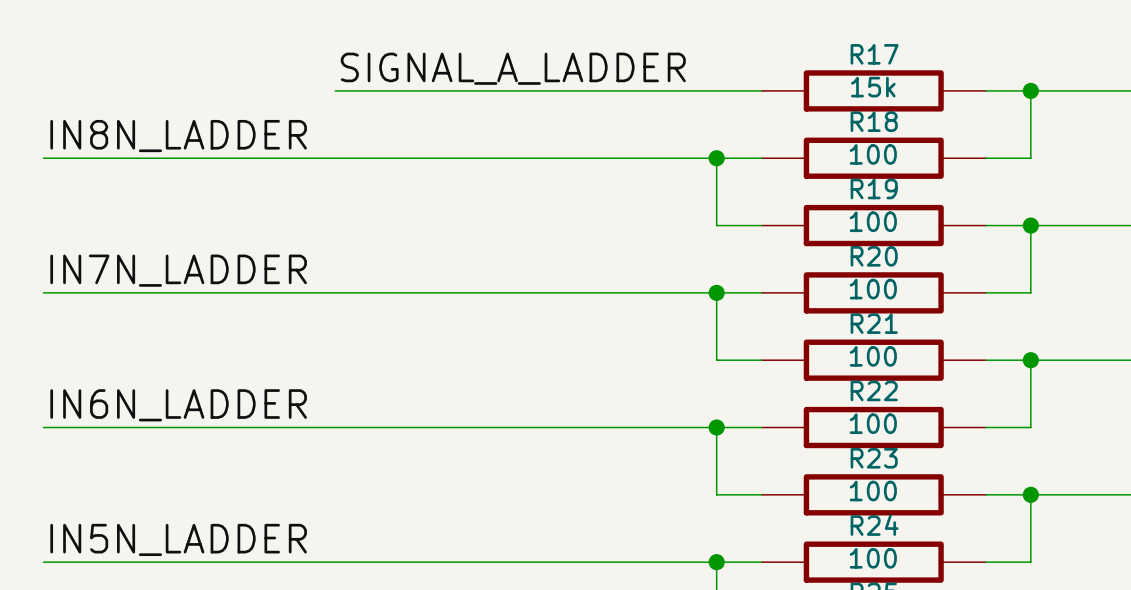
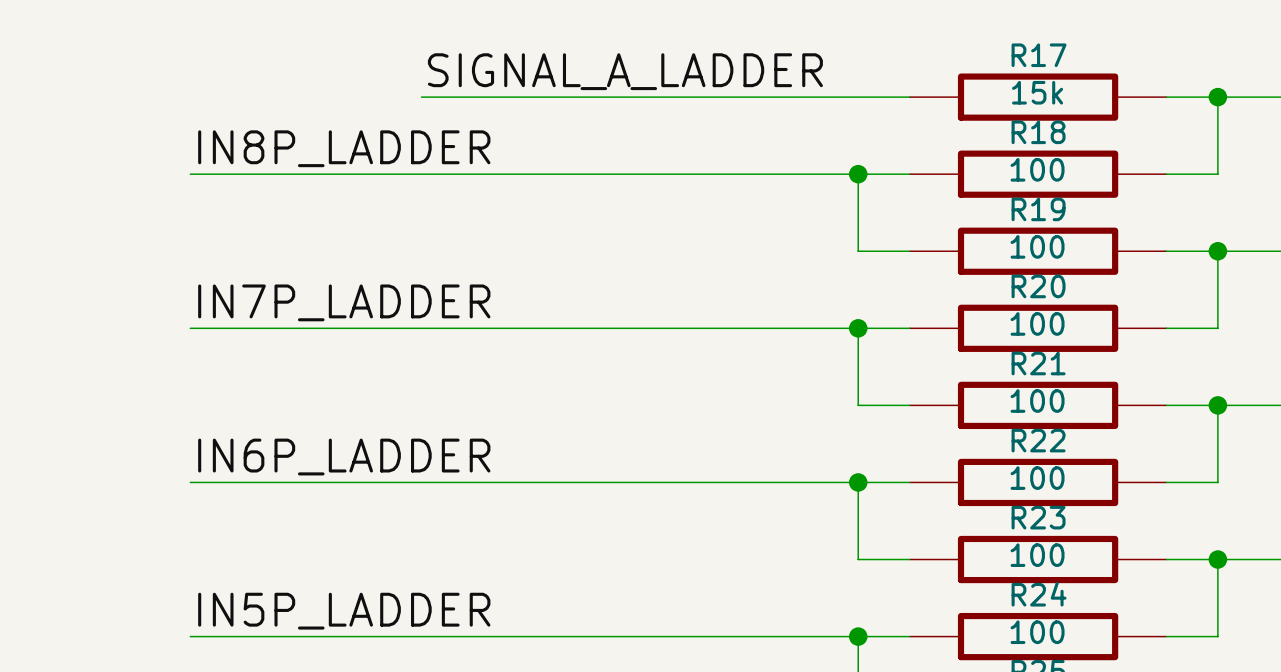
label: IN8N_LADDER (178, 136) -> IN8P_LADDER (344, 148)
wire: (43, 158) (133, 158) -> none
label: IN7N_LADDER (178, 270) -> IN7P_LADDER (344, 302)
wire: (43, 292) (133, 292) -> none
label: IN6N_LADDER (178, 405) -> IN6P_LADDER (344, 457)
wire: (43, 427) (133, 427) -> none
label: IN5N_LADDER (178, 539) -> IN5P_LADDER (344, 611)
wire: (43, 562) (133, 562) -> none

